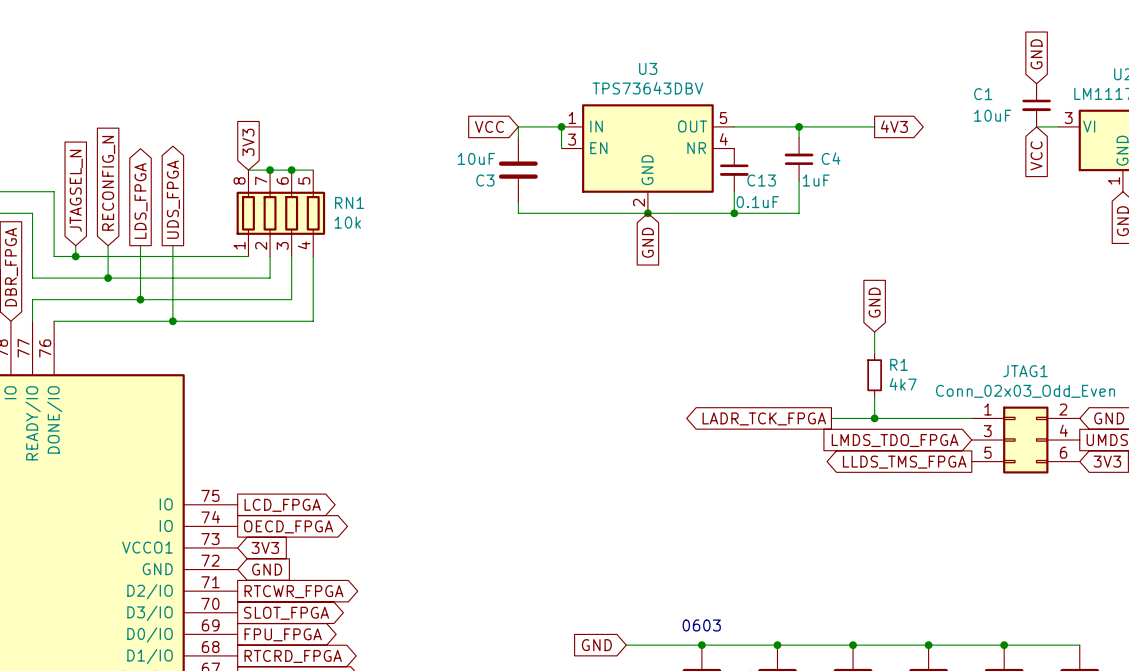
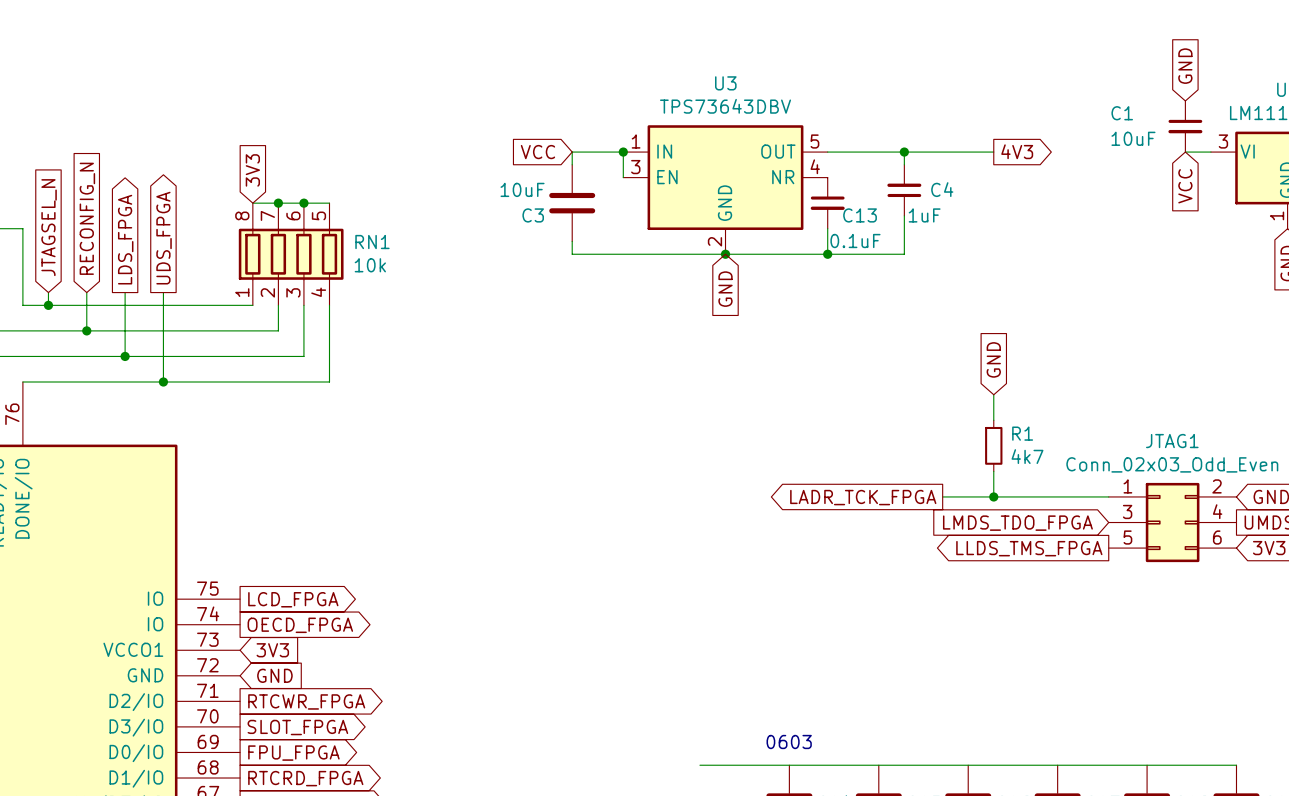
global label: GND (596, 645) -> none
junction: (701, 645) -> none
junction: (777, 645) -> none
junction: (853, 645) -> none
junction: (928, 645) -> none
junction: (1004, 645) -> none

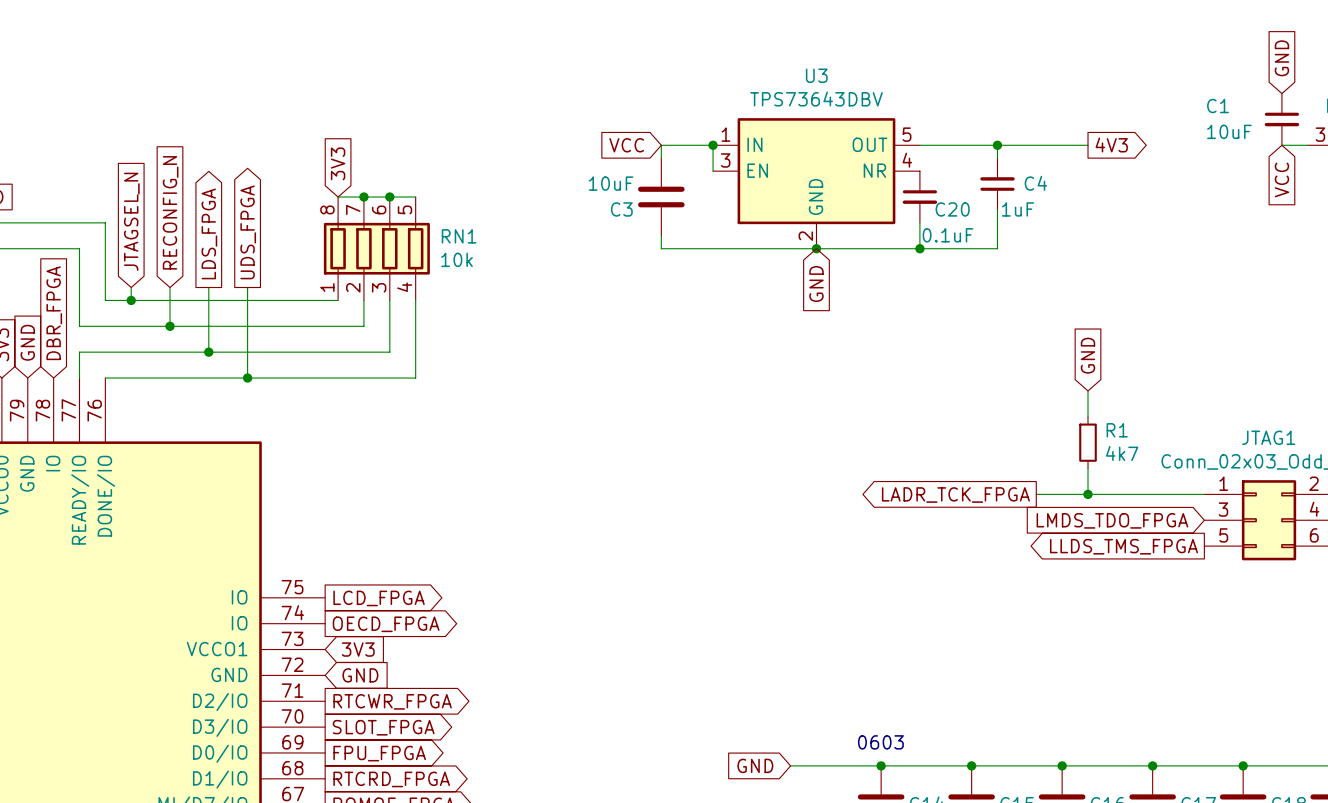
C13 name: C13 (860, 215) -> C20 (952, 209)
global label: none -> GND (755, 765)
junction: none -> (881, 765)
junction: none -> (971, 765)
junction: none -> (1062, 765)
junction: none -> (1152, 765)
junction: none -> (1243, 765)

